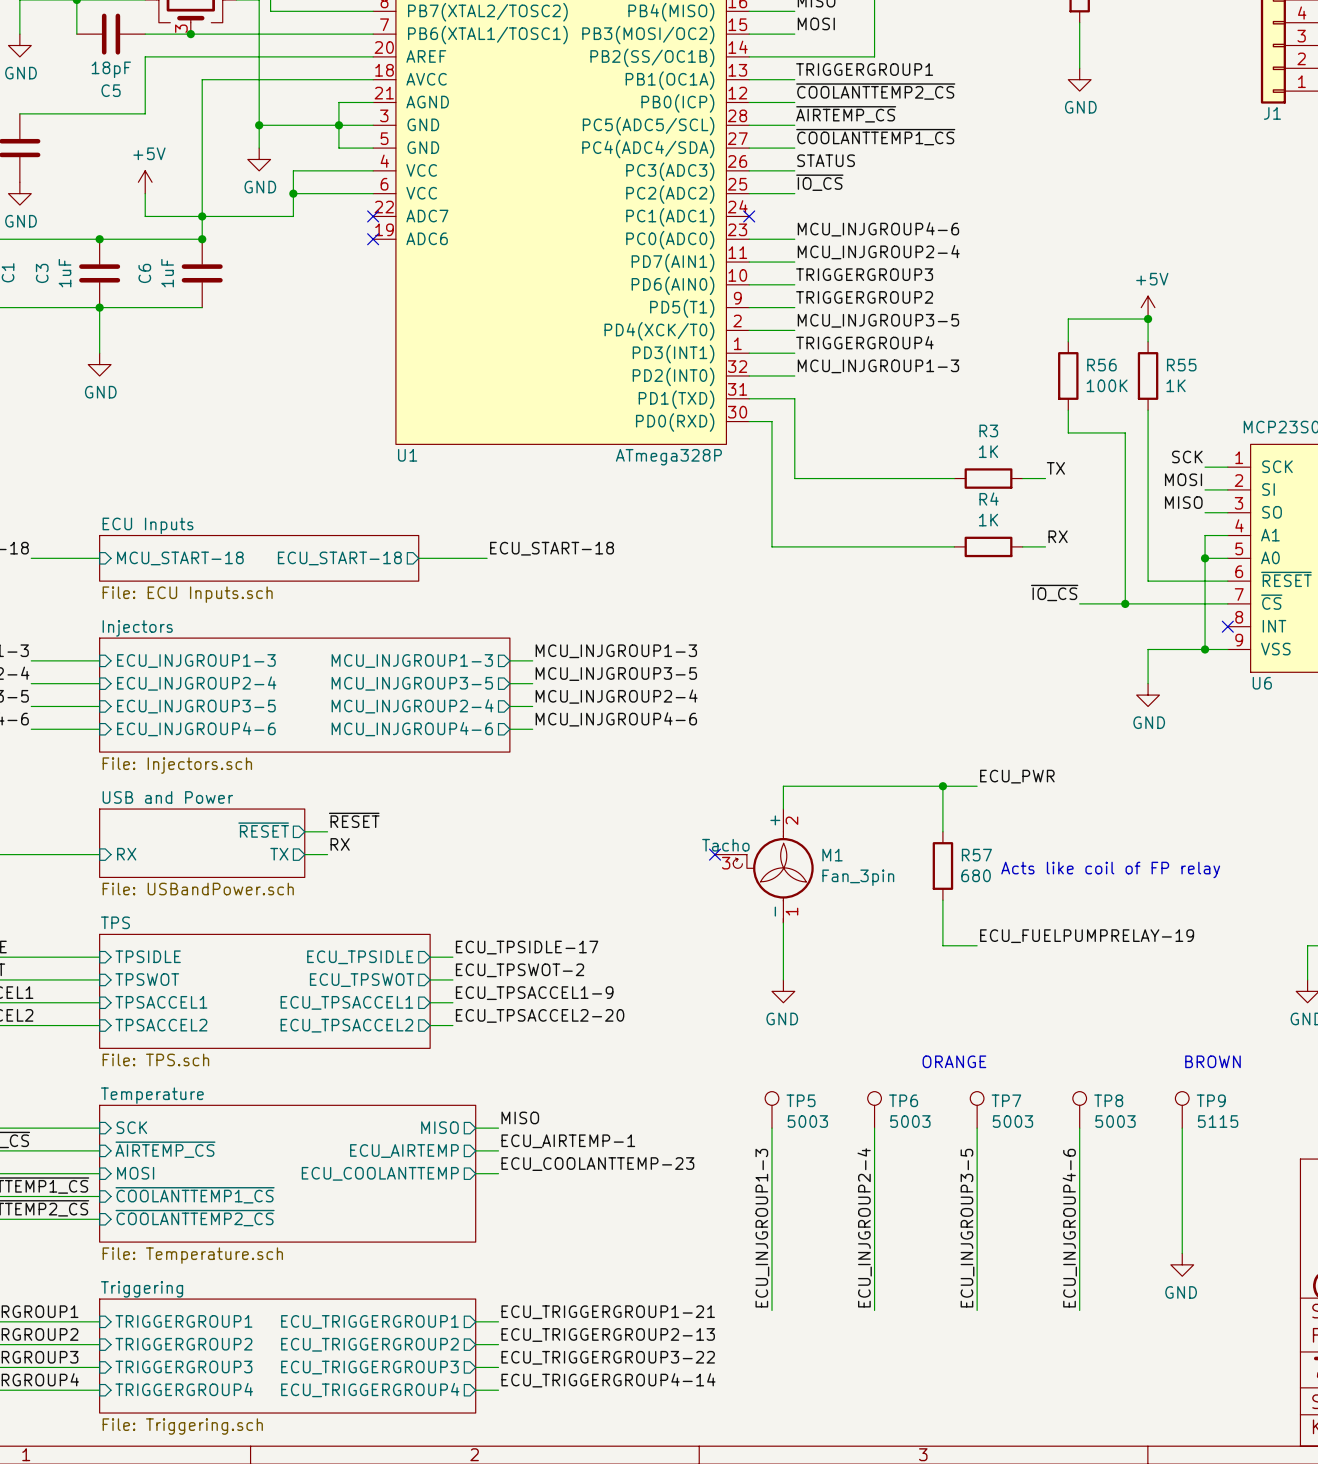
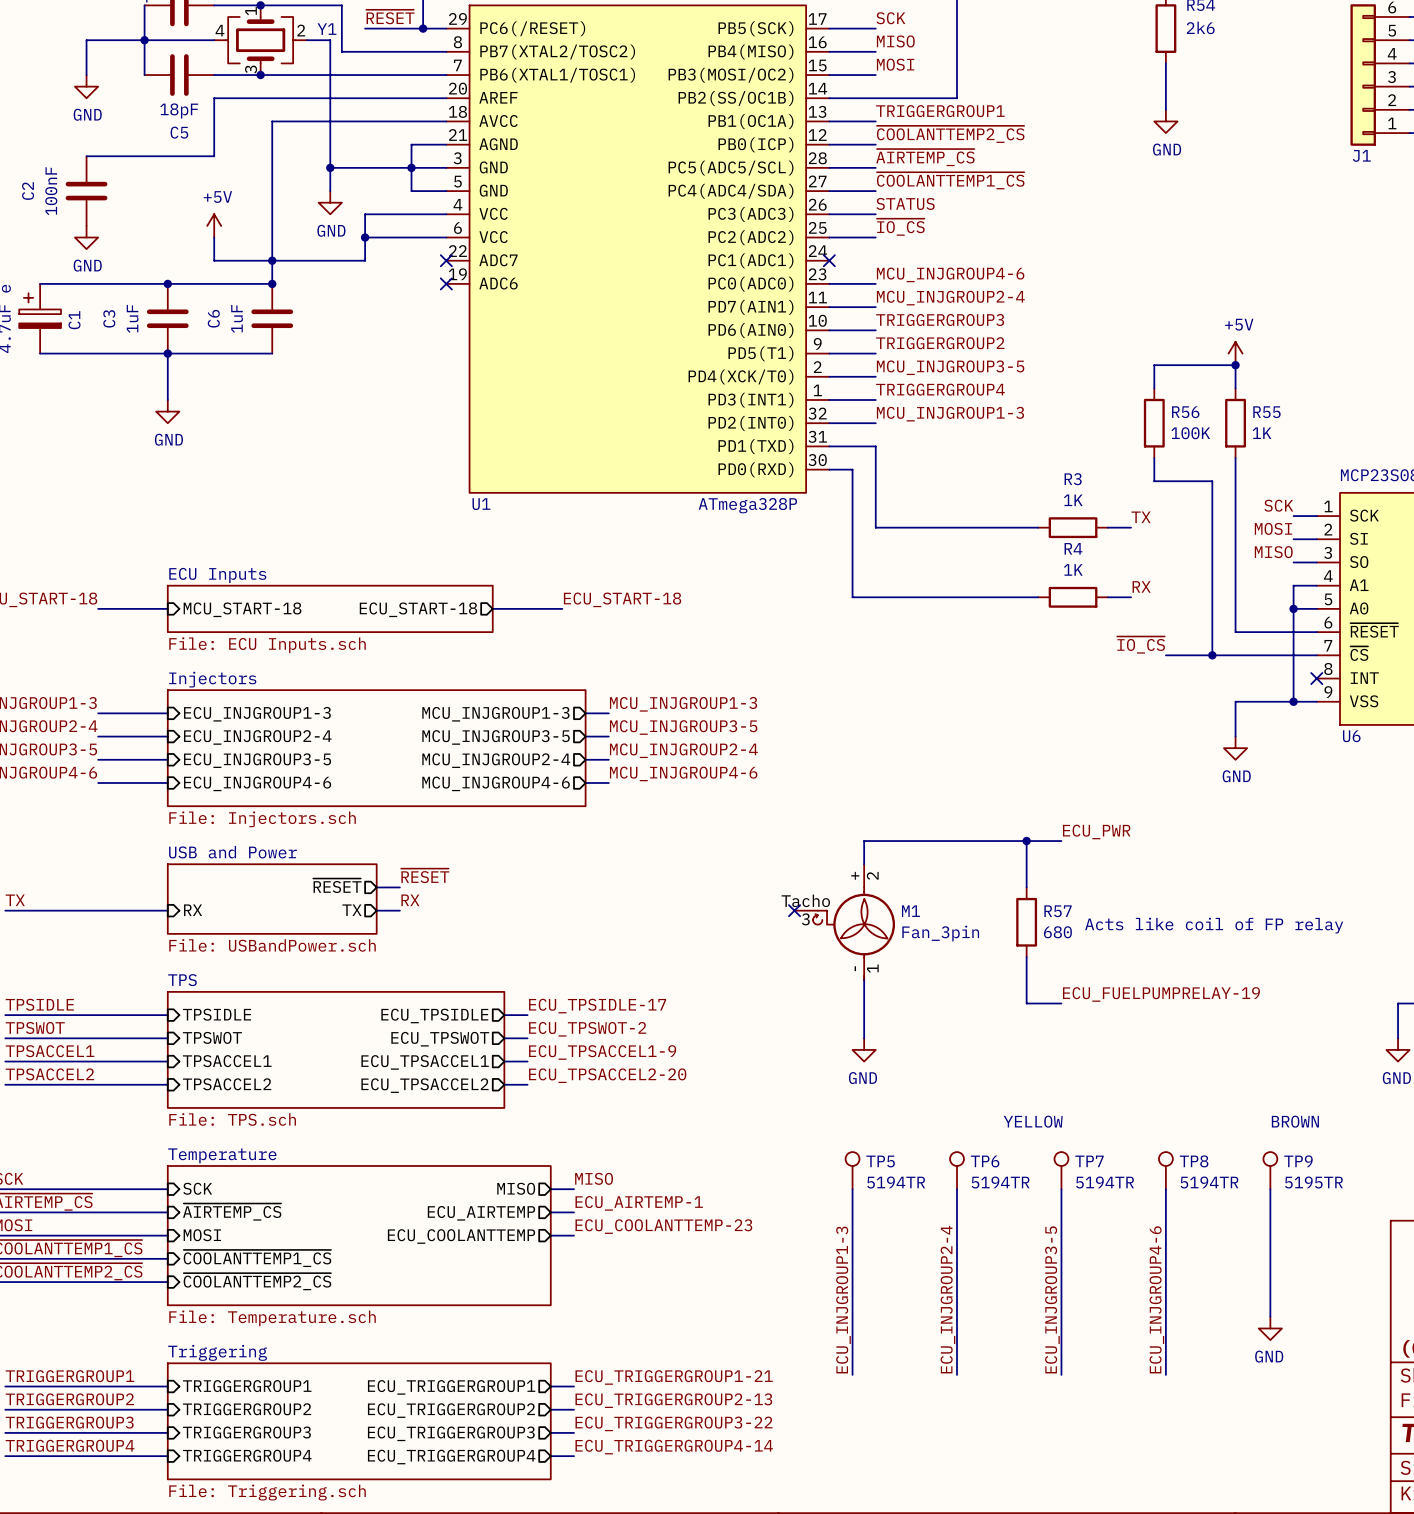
text: ORANGE (954, 1061) -> YELLOW (1033, 1121)
TP5 value: 5003 (807, 1121) -> 5194TR (896, 1182)
TP6 value: 5003 (910, 1121) -> 5194TR (1000, 1182)
TP7 value: 5003 (1012, 1121) -> 5194TR (1105, 1182)
TP8 value: 5003 (1115, 1121) -> 5194TR (1209, 1182)
TP9 value: 5115 (1218, 1121) -> 5195TR (1313, 1182)

